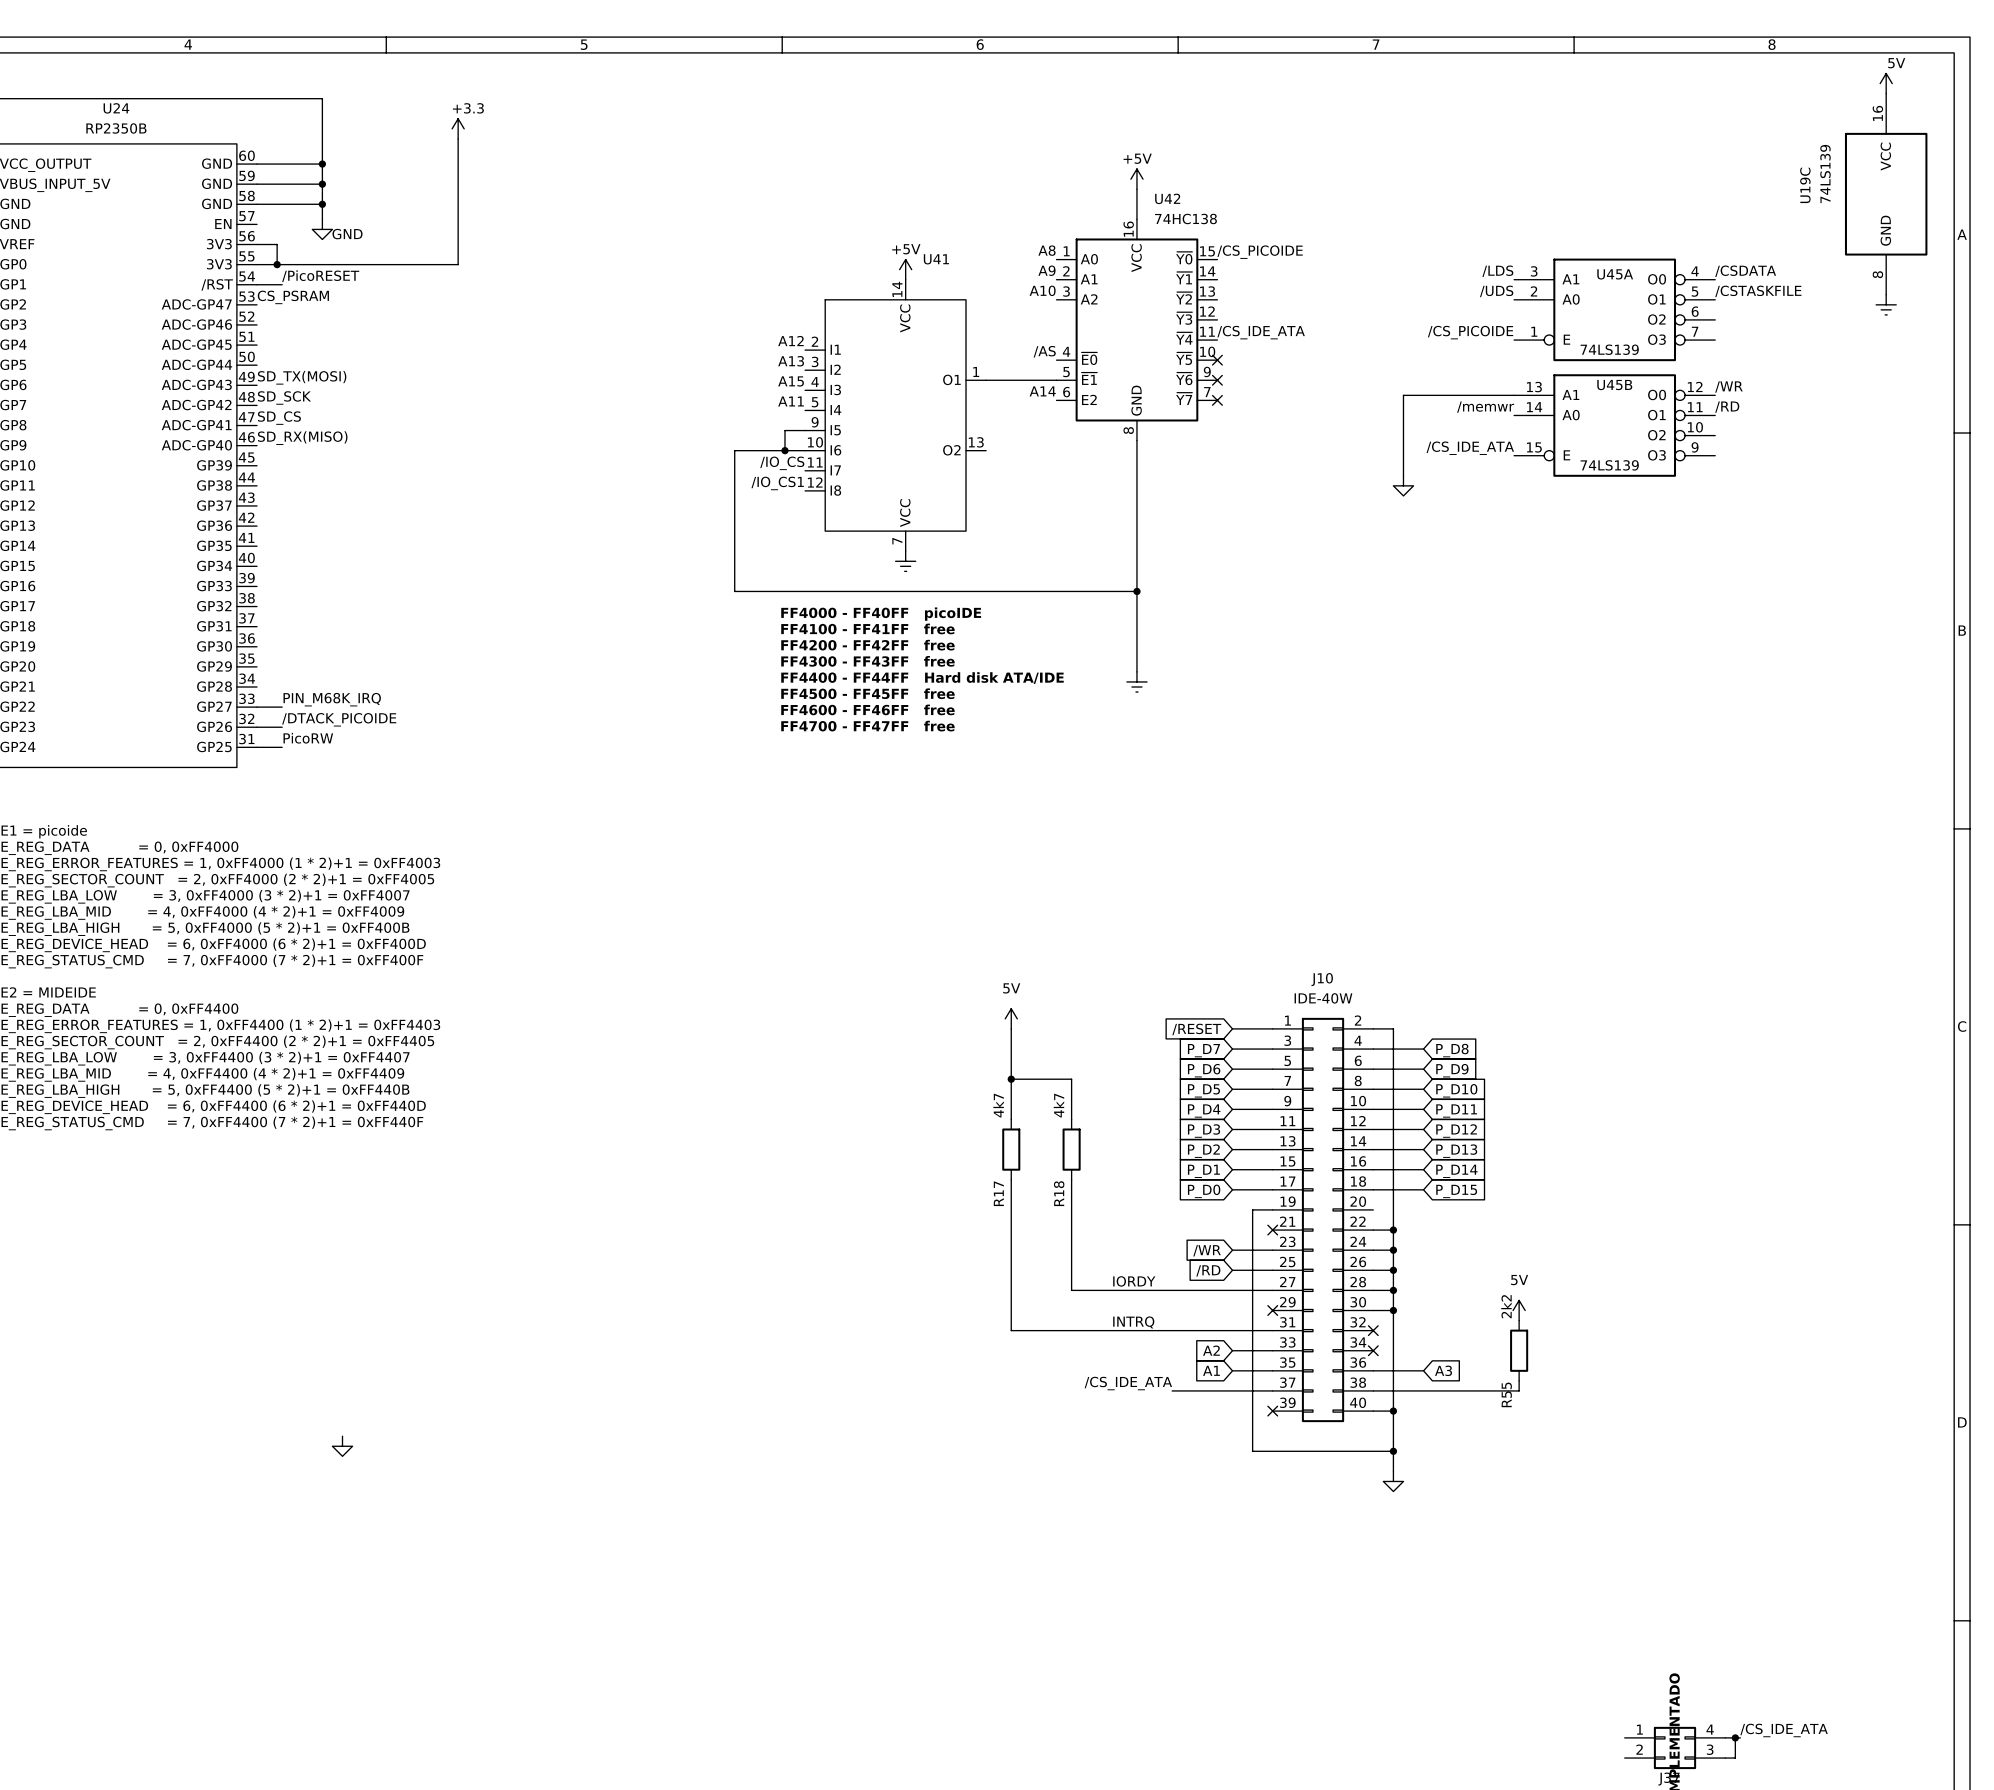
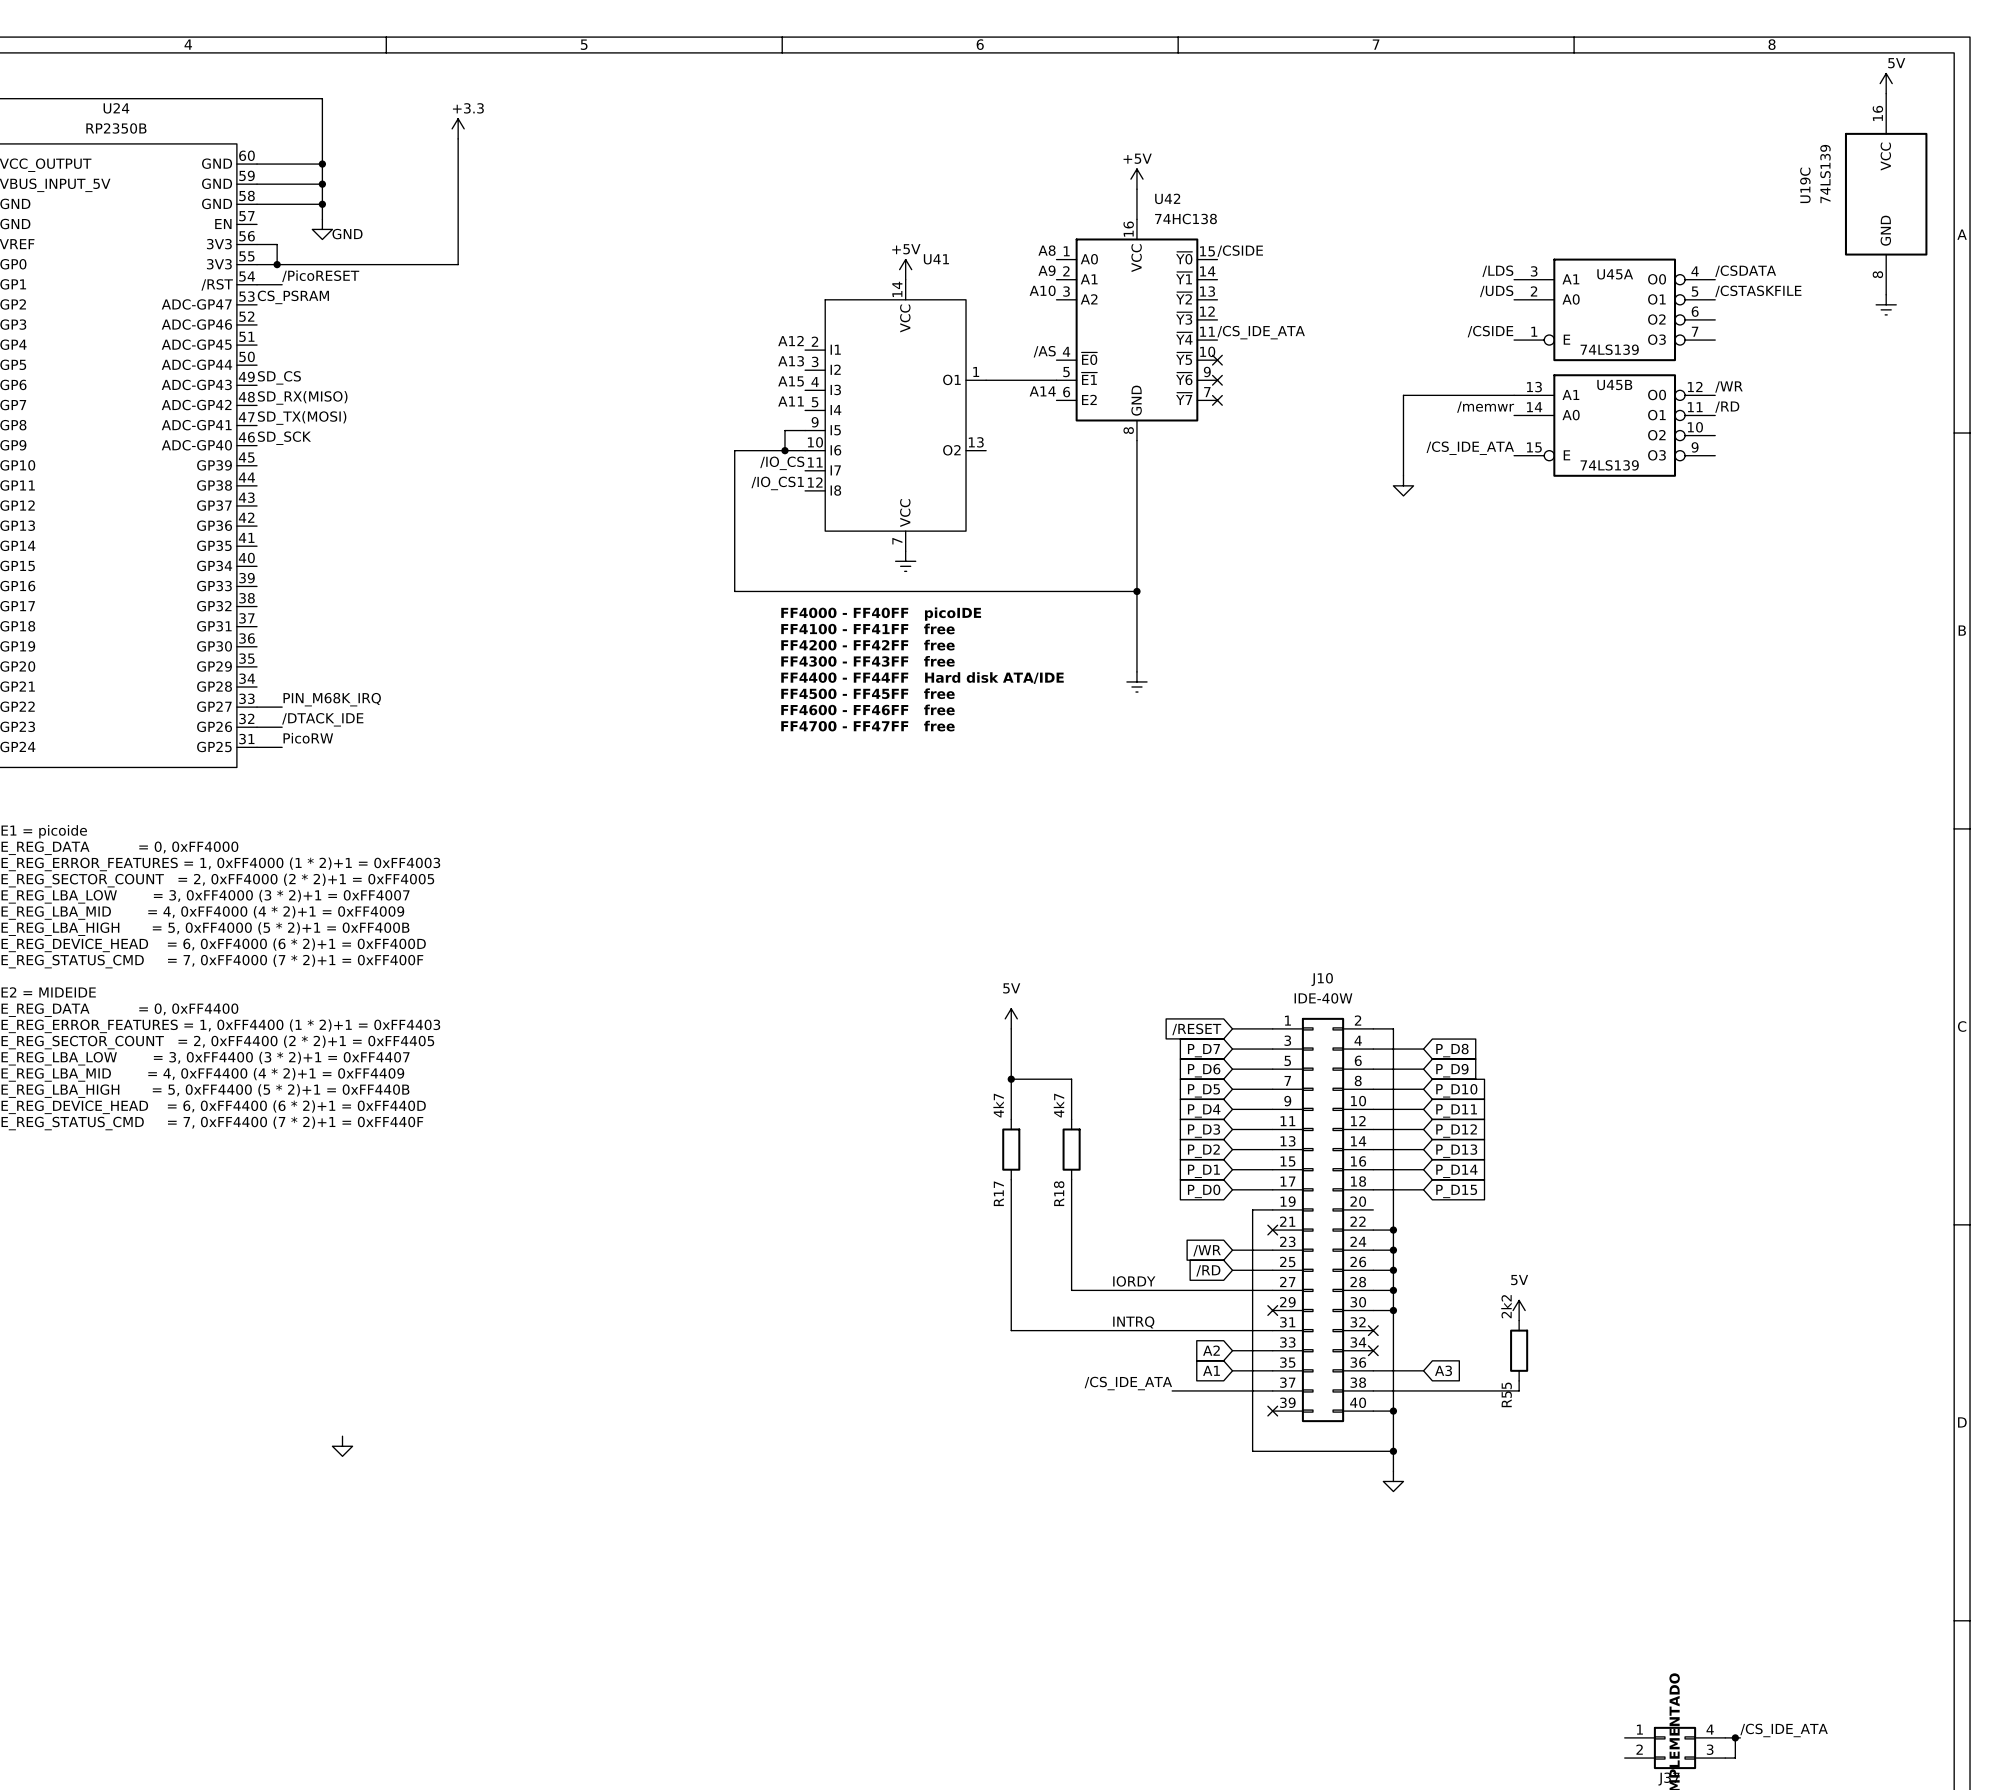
label: /CS_PICOIDE (1260, 252) -> /CSIDE (1240, 251)
label: /CS_PICOIDE (1470, 332) -> /CSIDE (1490, 331)
label: SD_TX(MOSI) (302, 377) -> SD_CS (279, 377)
label: SD_SCK (284, 397) -> SD_RX(MISO) (302, 397)
label: SD_CS (279, 418) -> SD_TX(MOSI) (302, 417)
label: SD_RX(MISO) (302, 438) -> SD_SCK (284, 438)
label: /DTACK_PICOIDE (339, 719) -> /DTACK_IDE (322, 719)

